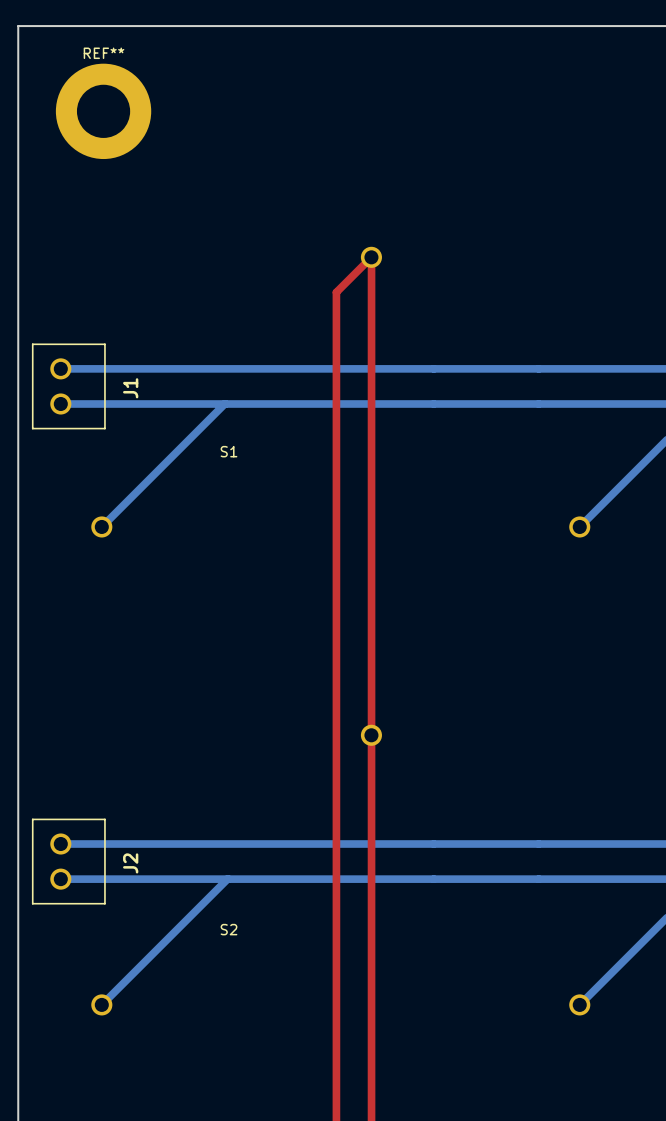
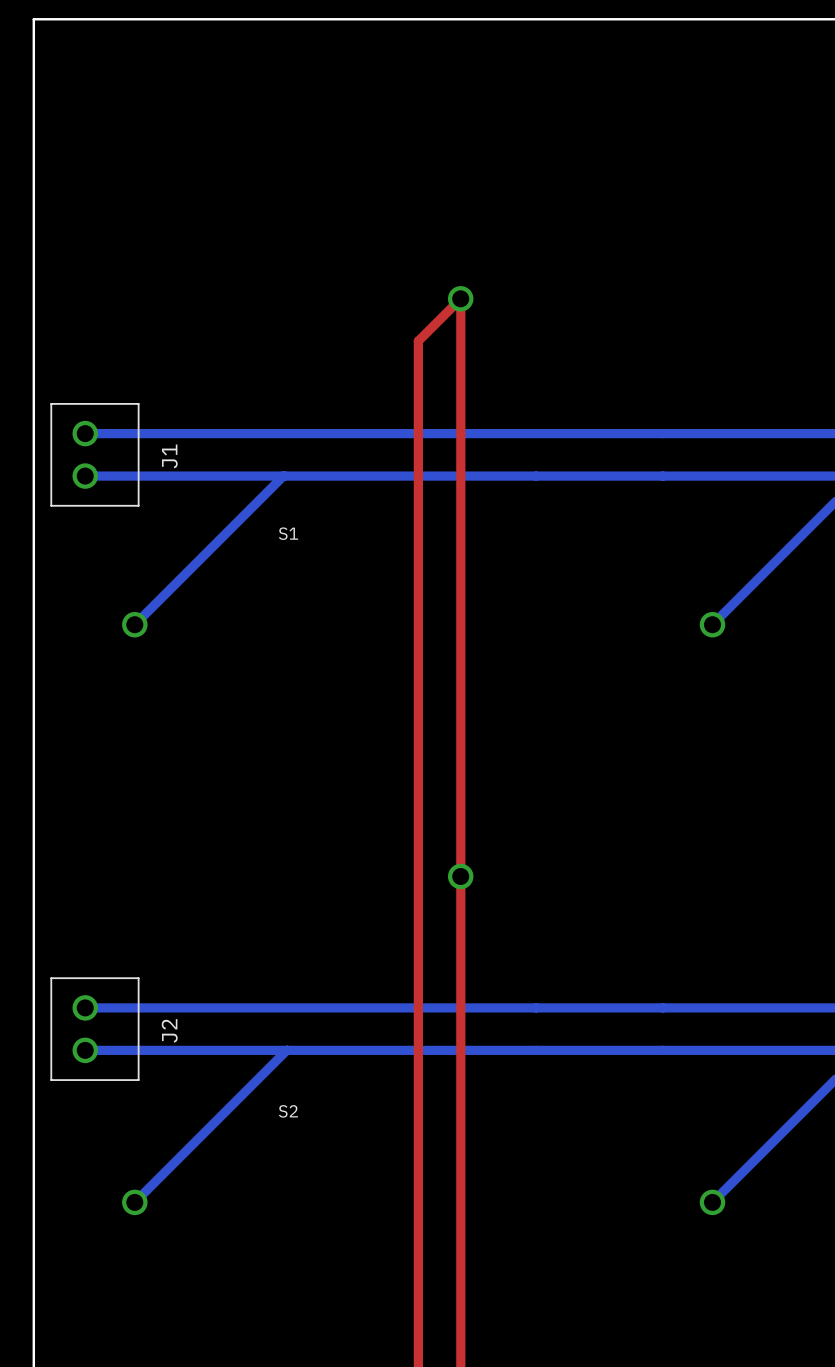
REF**: (103, 111) -> none

